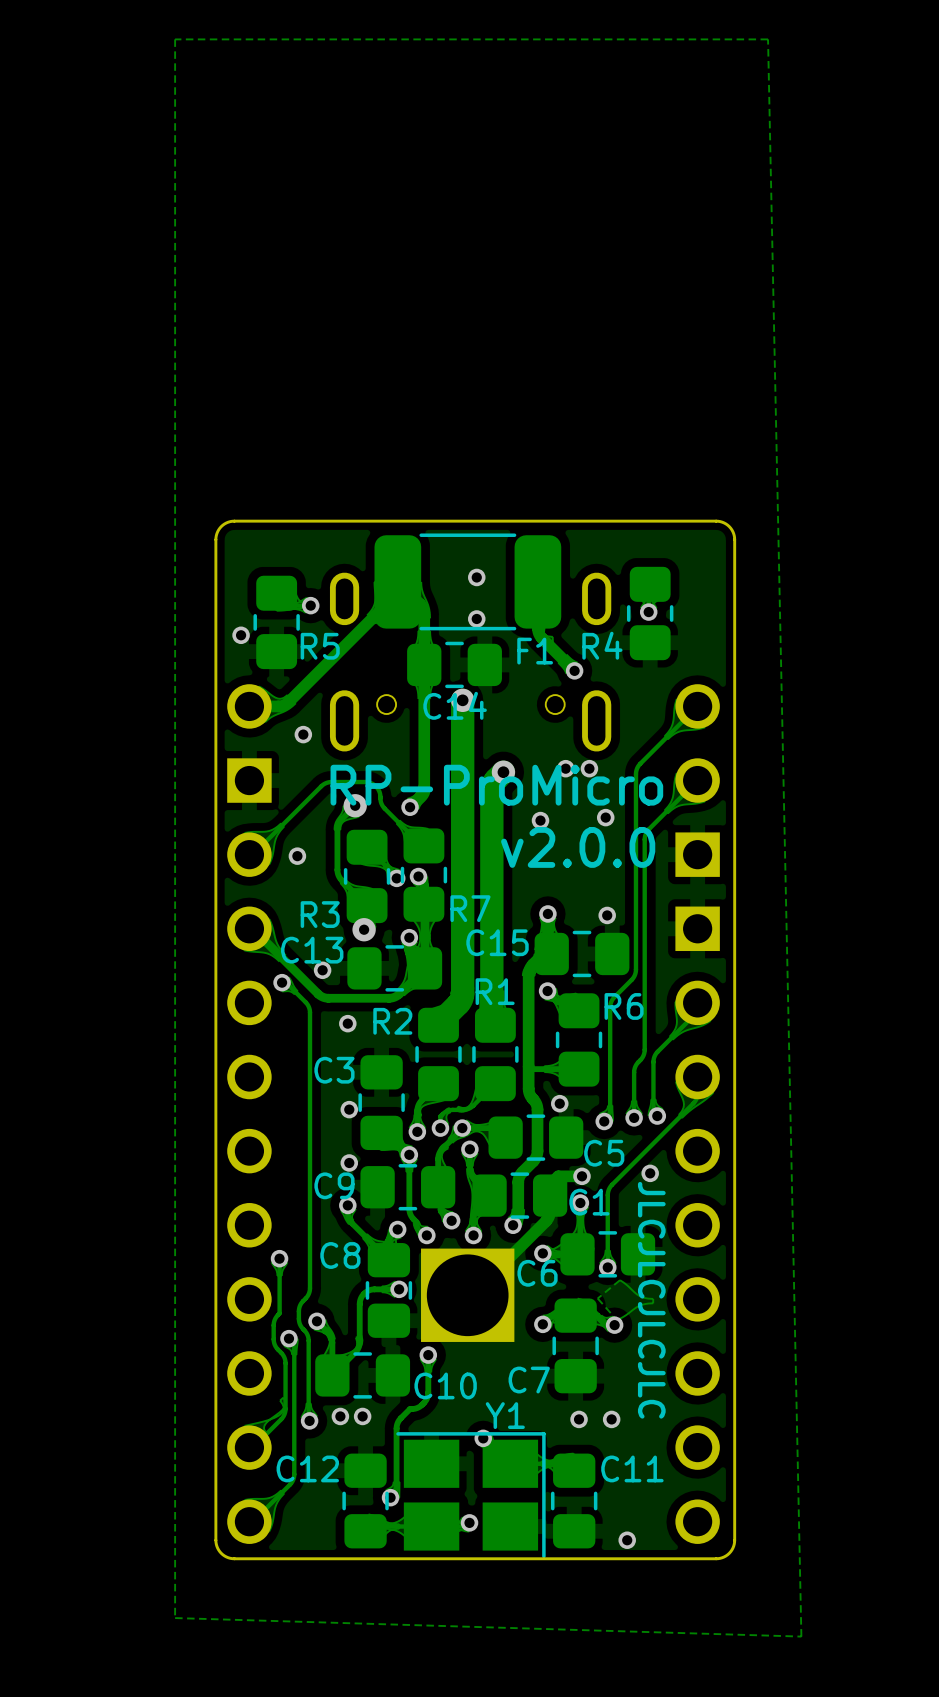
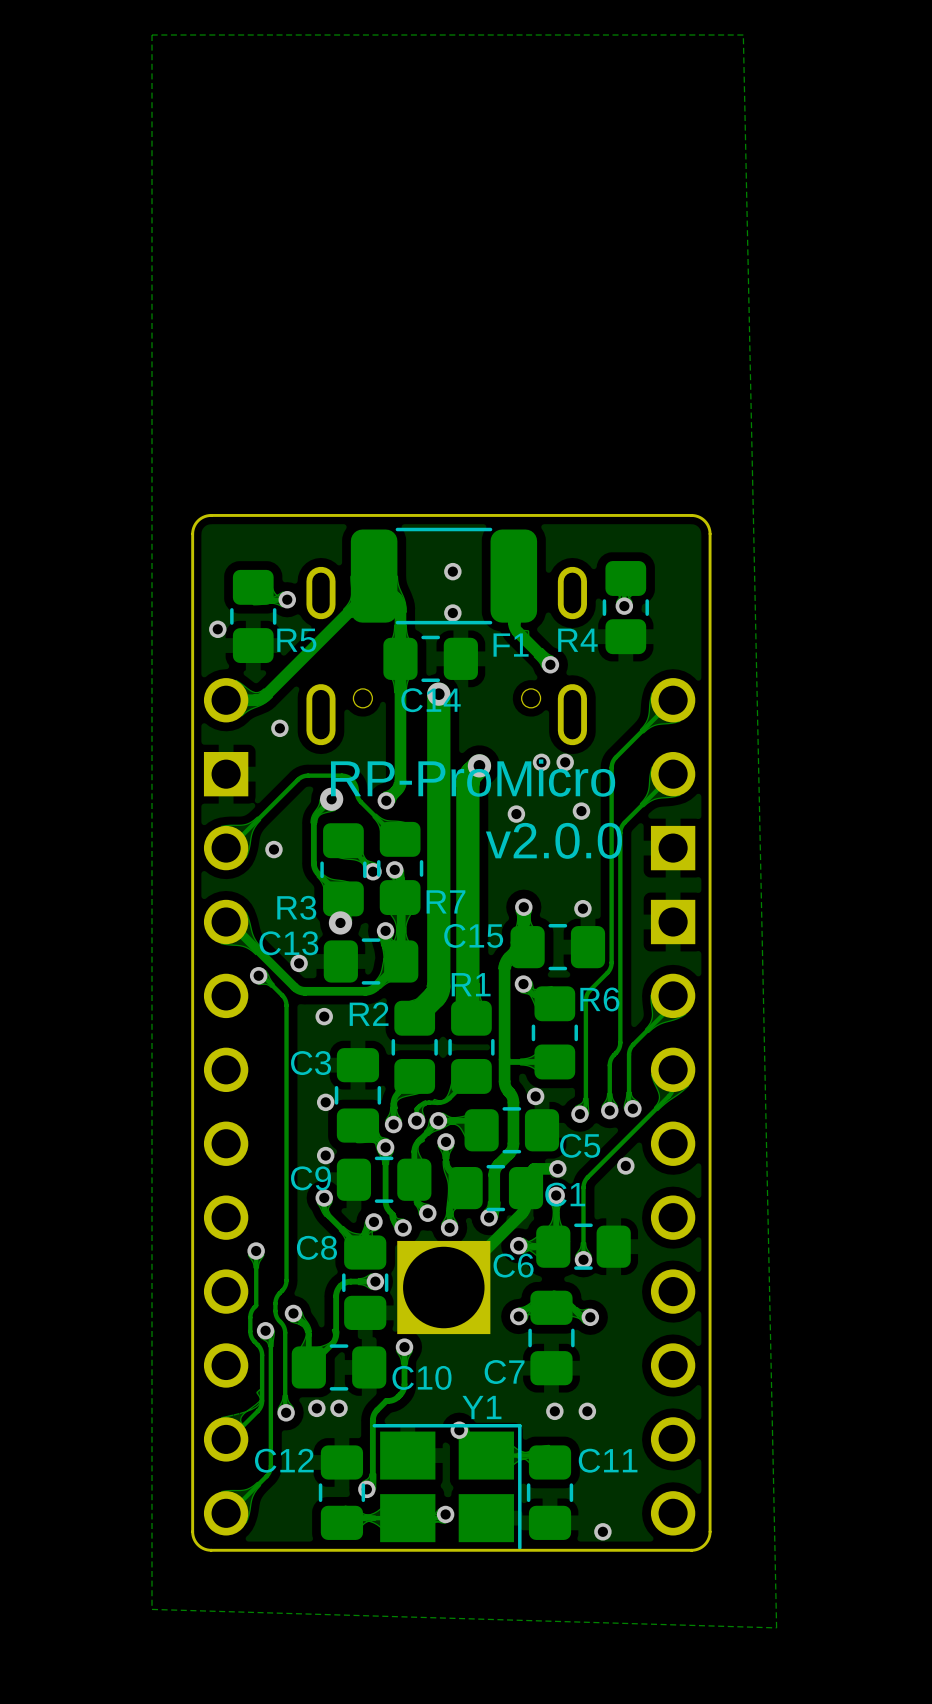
drawing: [637, 1181, 666, 1419] -> none
zone outline: (620, 1280) (640, 1296) (653, 1298) (653, 1303) (639, 1305) (616, 1320) (597, 1298) (620, 1280) -> none

